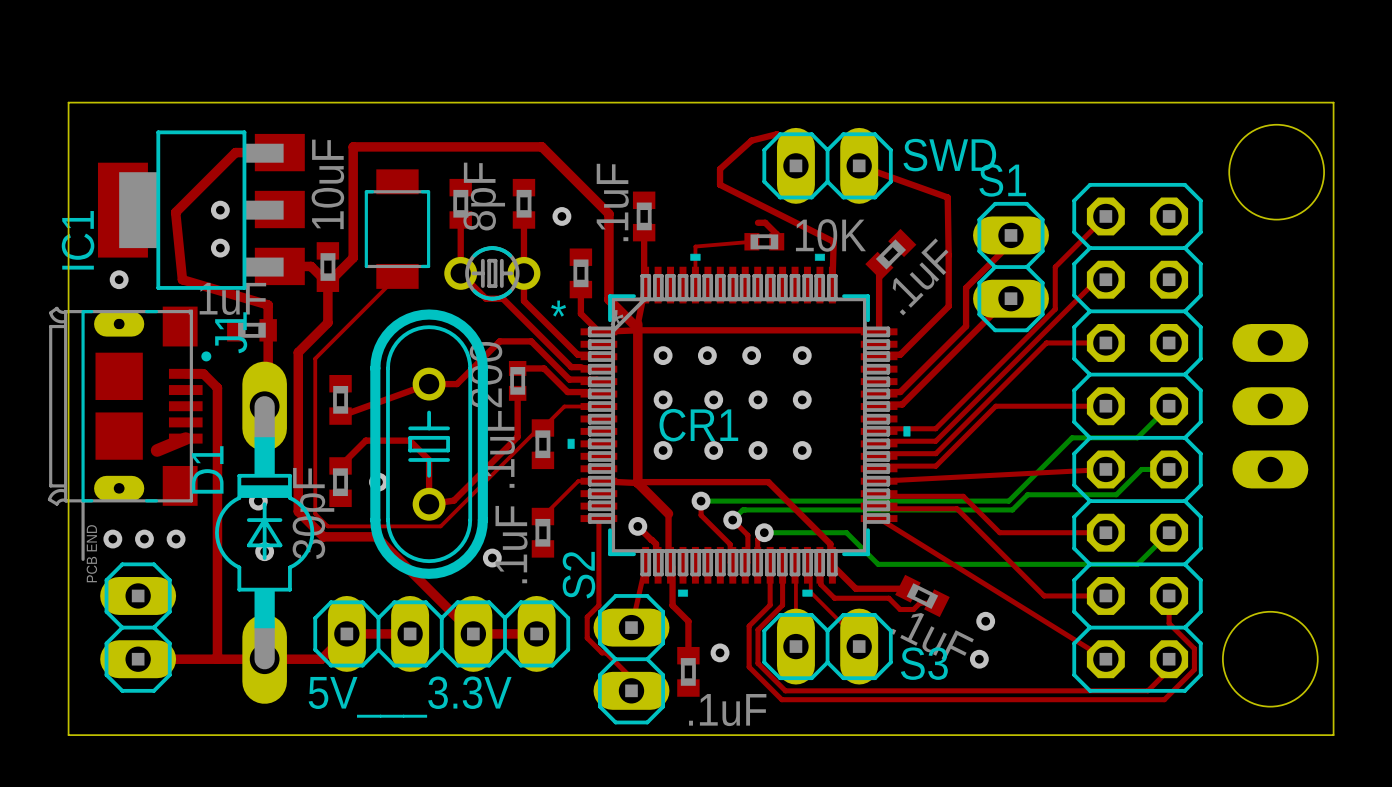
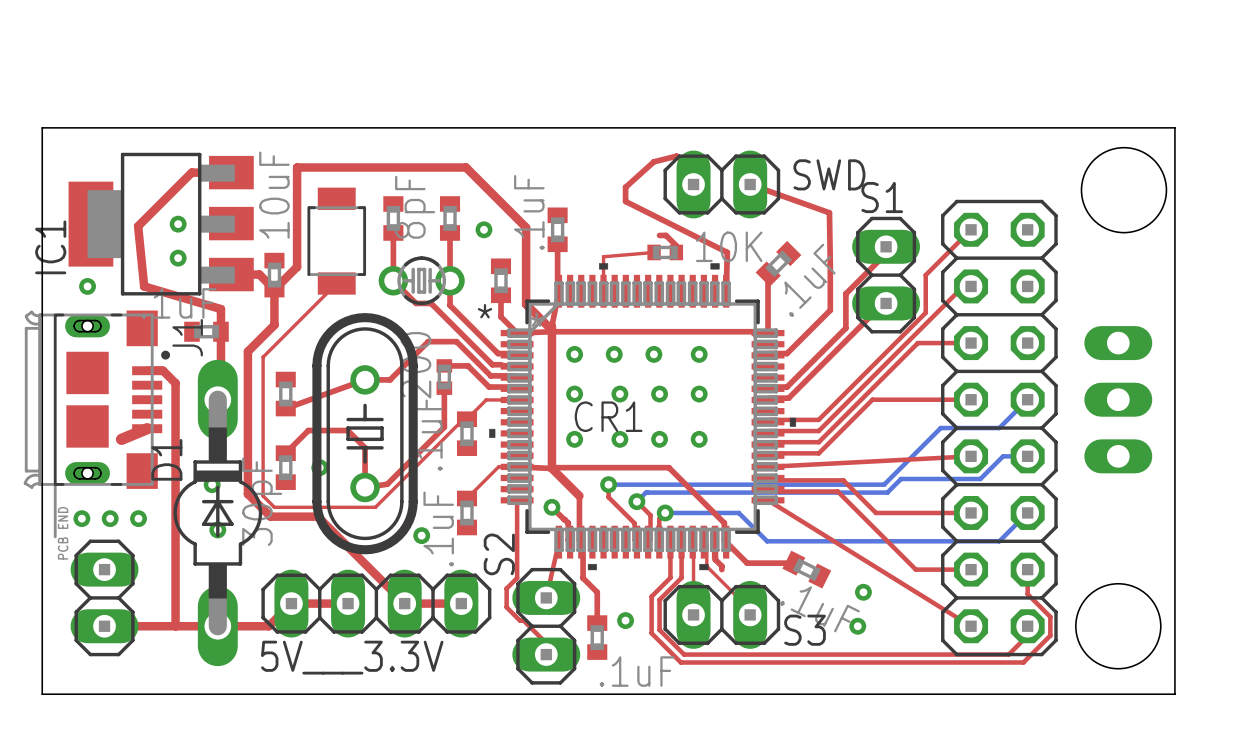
top track: (819, 565) (820, 584) (834, 598) (888, 598) (900, 609) (913, 609) (919, 603) (936, 603) -> (715, 542) (715, 559) (721, 566) (721, 569)

